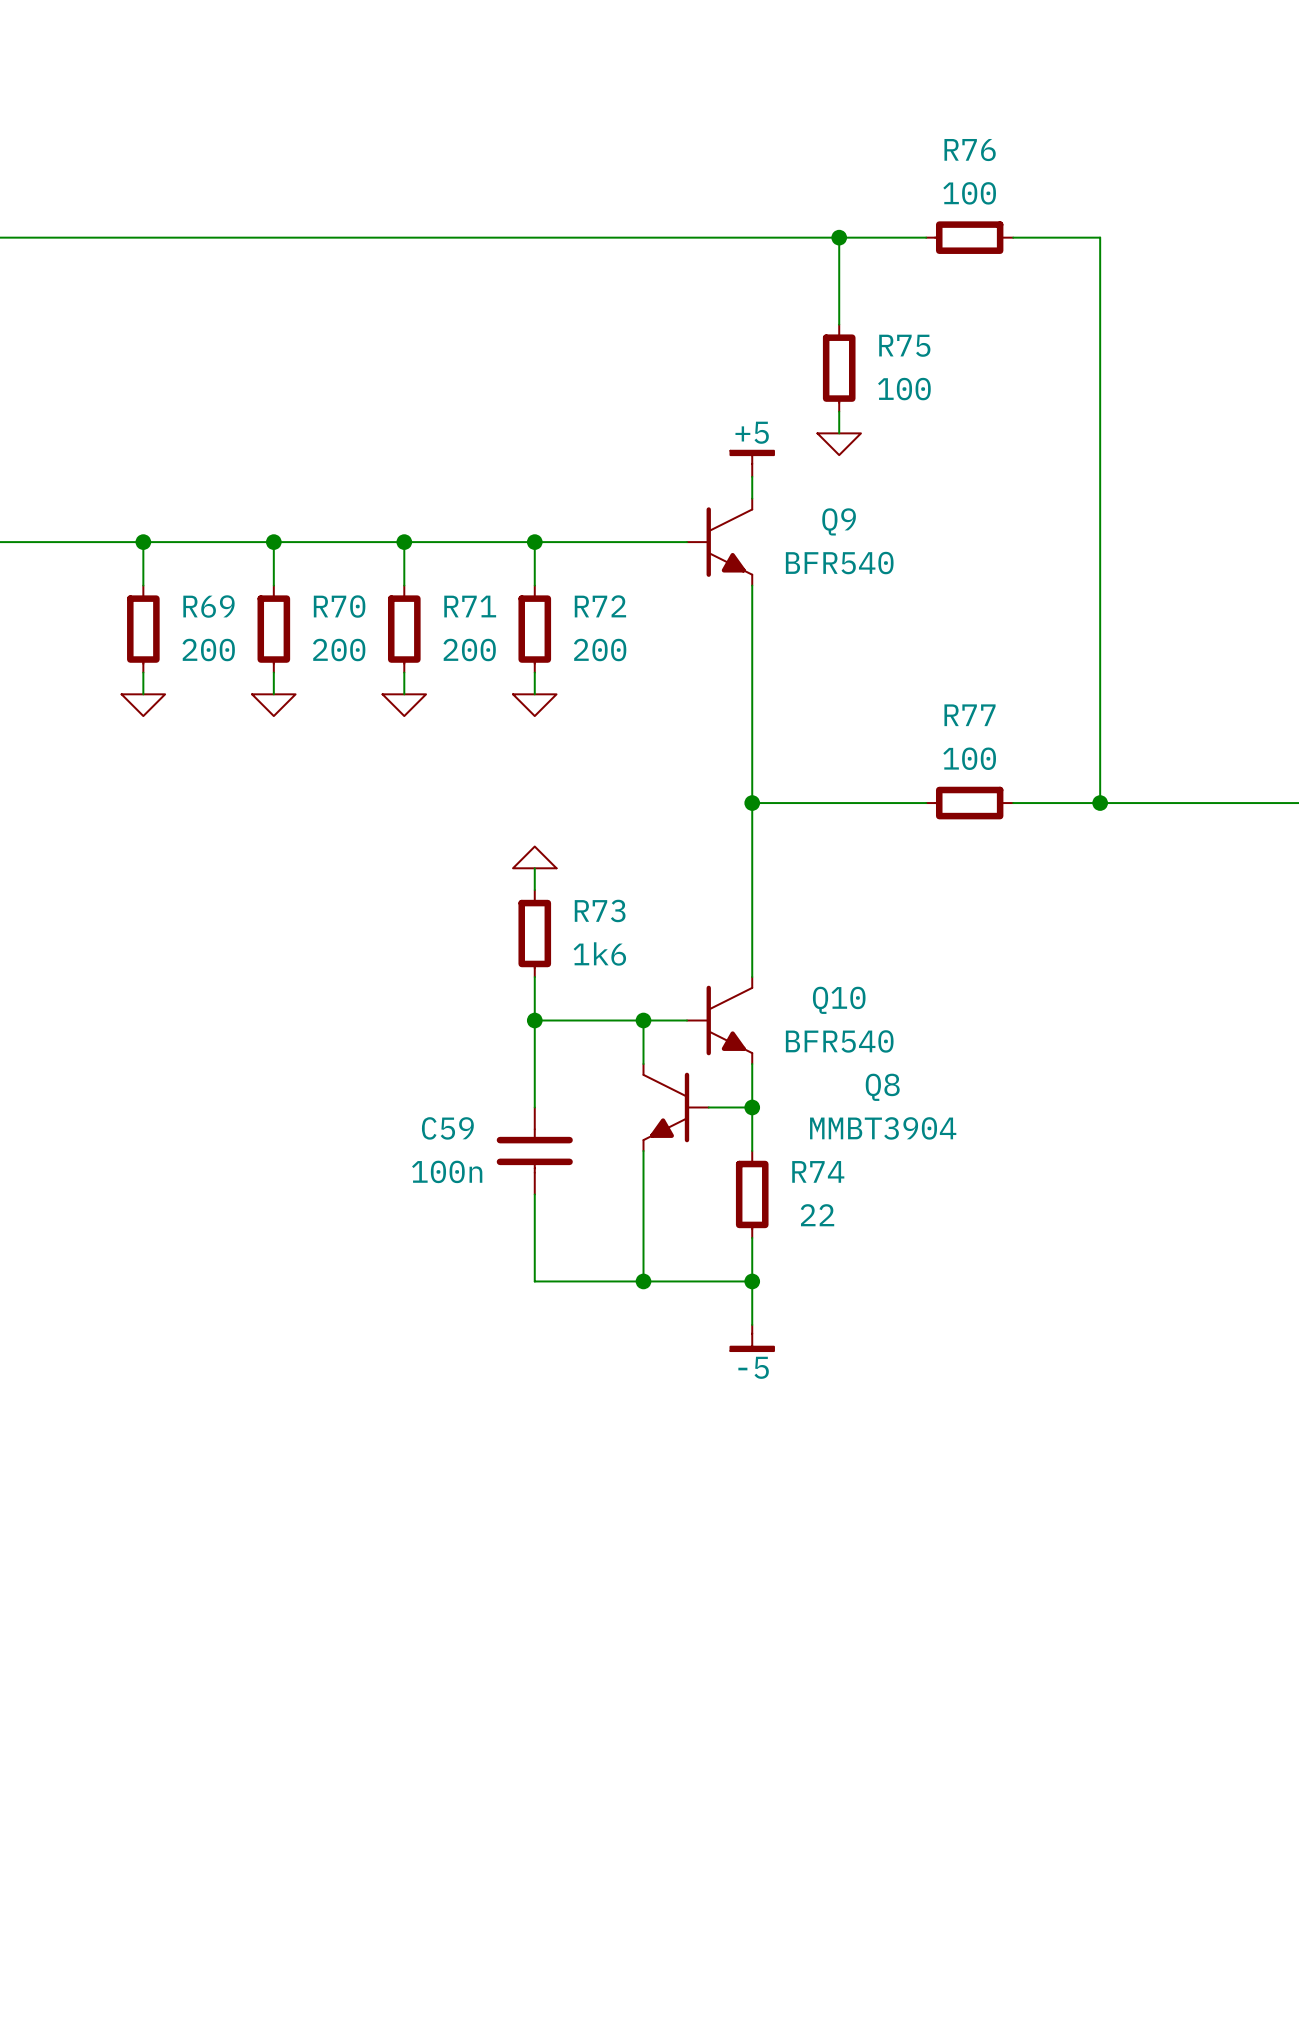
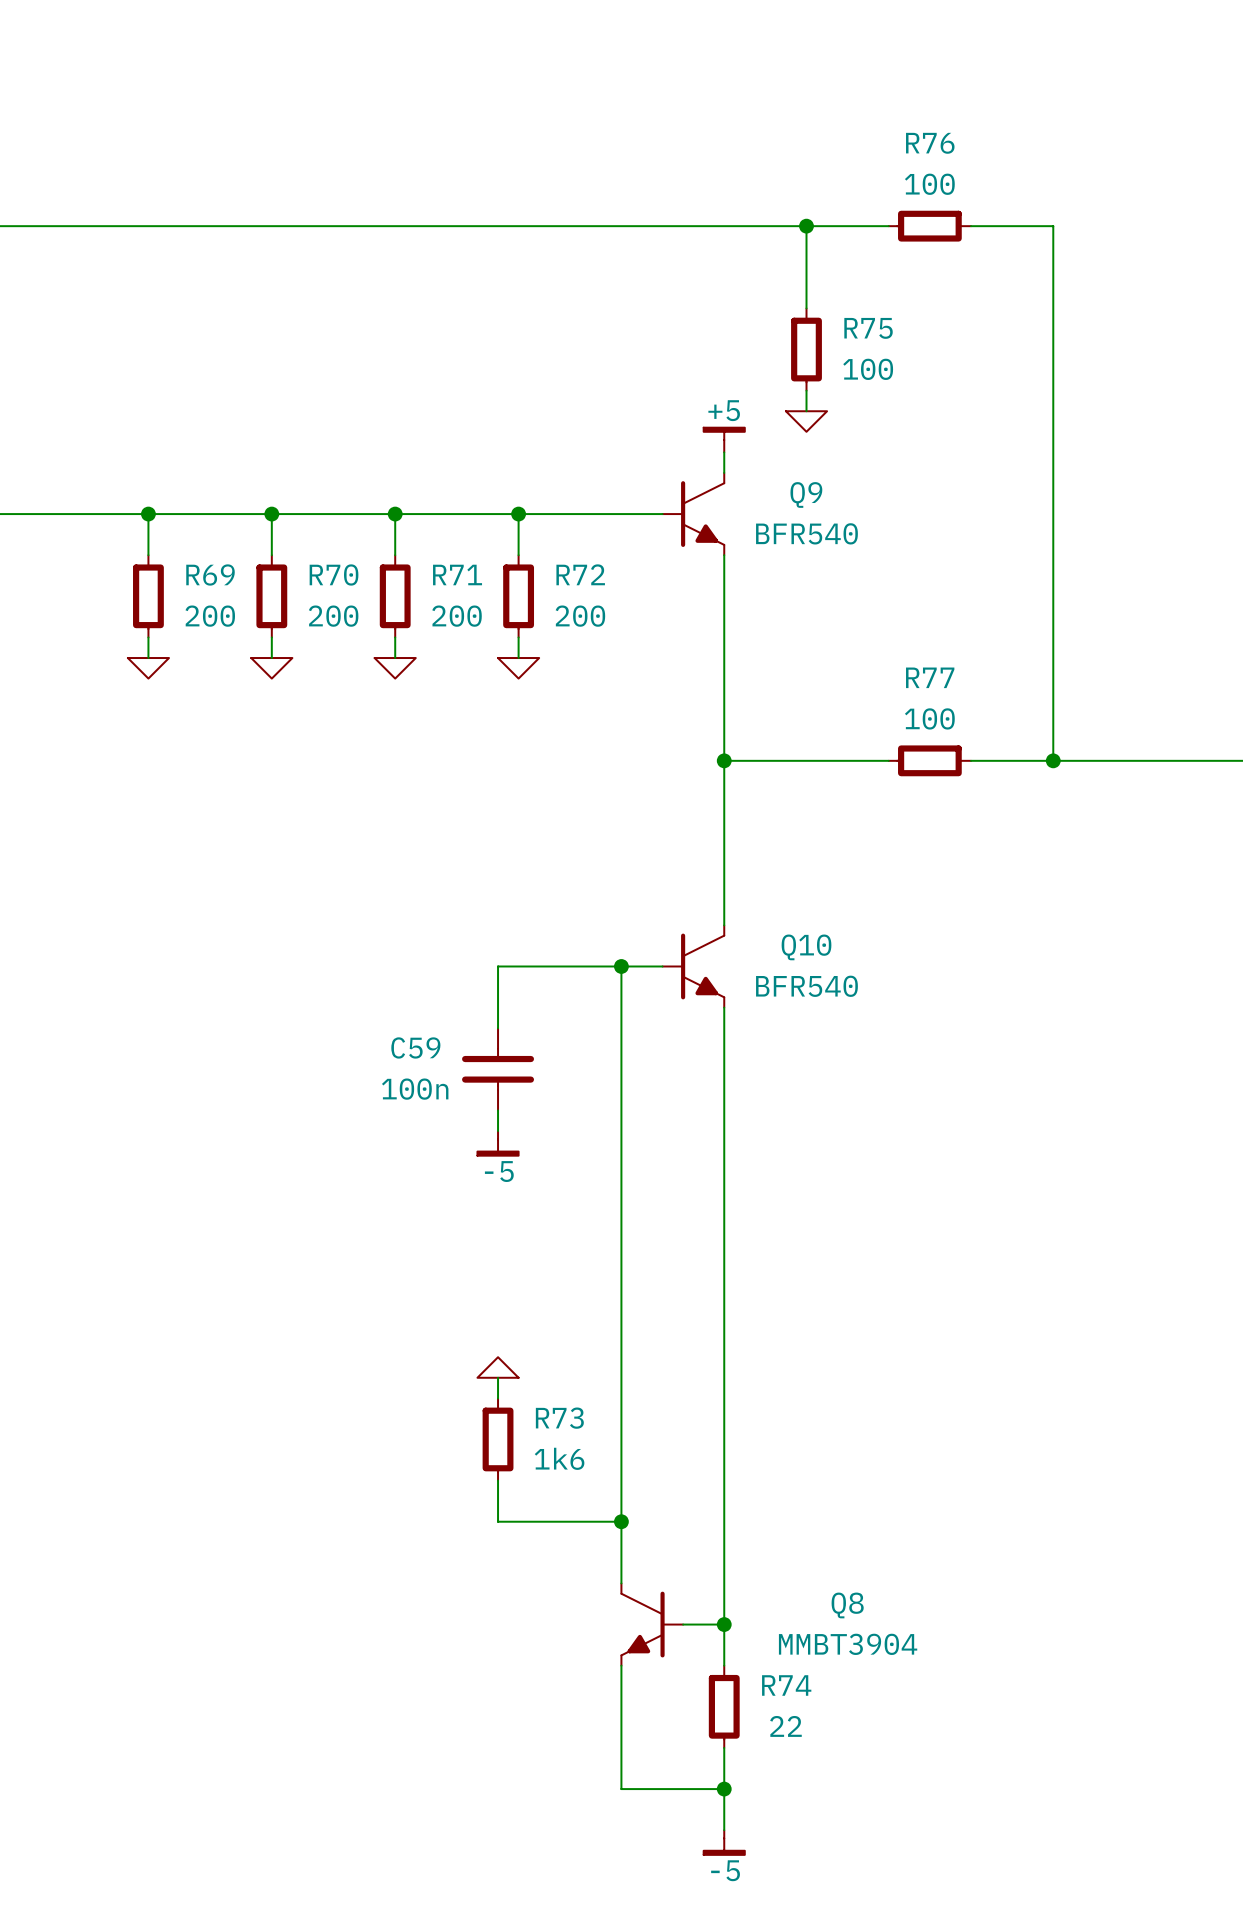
power symbol: (534, 857) -> none
wire: (534, 868) (534, 890) -> (498, 1110) (498, 1131)
R73 position: (534, 933) -> (498, 1439)
wire: (534, 977) (534, 1107) -> none
wire: none -> (518, 966) (498, 966) (498, 1028)
junction: (534, 1020) -> none
wire: none -> (621, 1007) (621, 1089)
Q8 position: (676, 1107) -> (652, 1624)
wire: (708, 1107) (752, 1107) -> none
junction: (752, 1107) -> none
C59 position: (534, 1150) -> (498, 1069)
wire: none -> (724, 1089) (724, 1172)
wire: (534, 1194) (534, 1281) (752, 1281) -> none
R74 position: (752, 1194) -> (724, 1706)
wire: none -> (621, 1213) (621, 1583)
junction: (643, 1281) -> none
junction: (752, 1281) -> none
wire: none -> (724, 1254) (724, 1665)
power symbol position: -5 (752, 1337) -> -5 (498, 1143)
power symbol: none -> (498, 1367)
wire: none -> (498, 1377) (498, 1398)
wire: none -> (498, 1480) (498, 1521) (621, 1521)
junction: none -> (621, 1521)
wire: none -> (683, 1624) (724, 1624)
junction: none -> (724, 1624)
wire: none -> (621, 1665) (621, 1789) (724, 1789)
wire: none -> (724, 1747) (724, 1830)
junction: none -> (724, 1789)
power symbol: none -> -5 (724, 1842)

